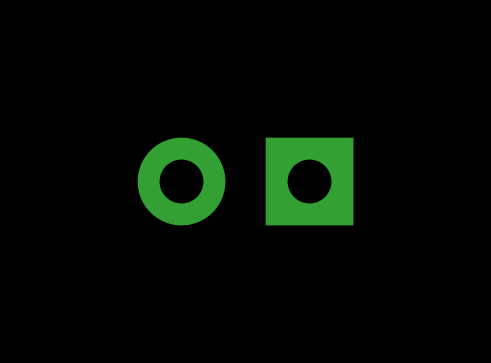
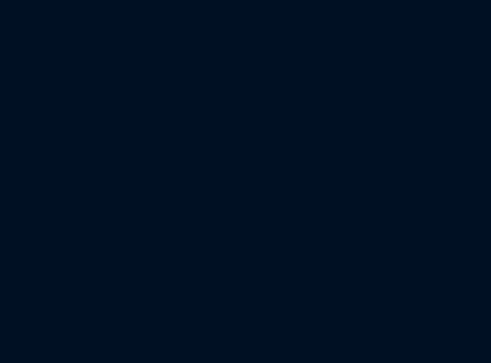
part: (245, 181) -> none

